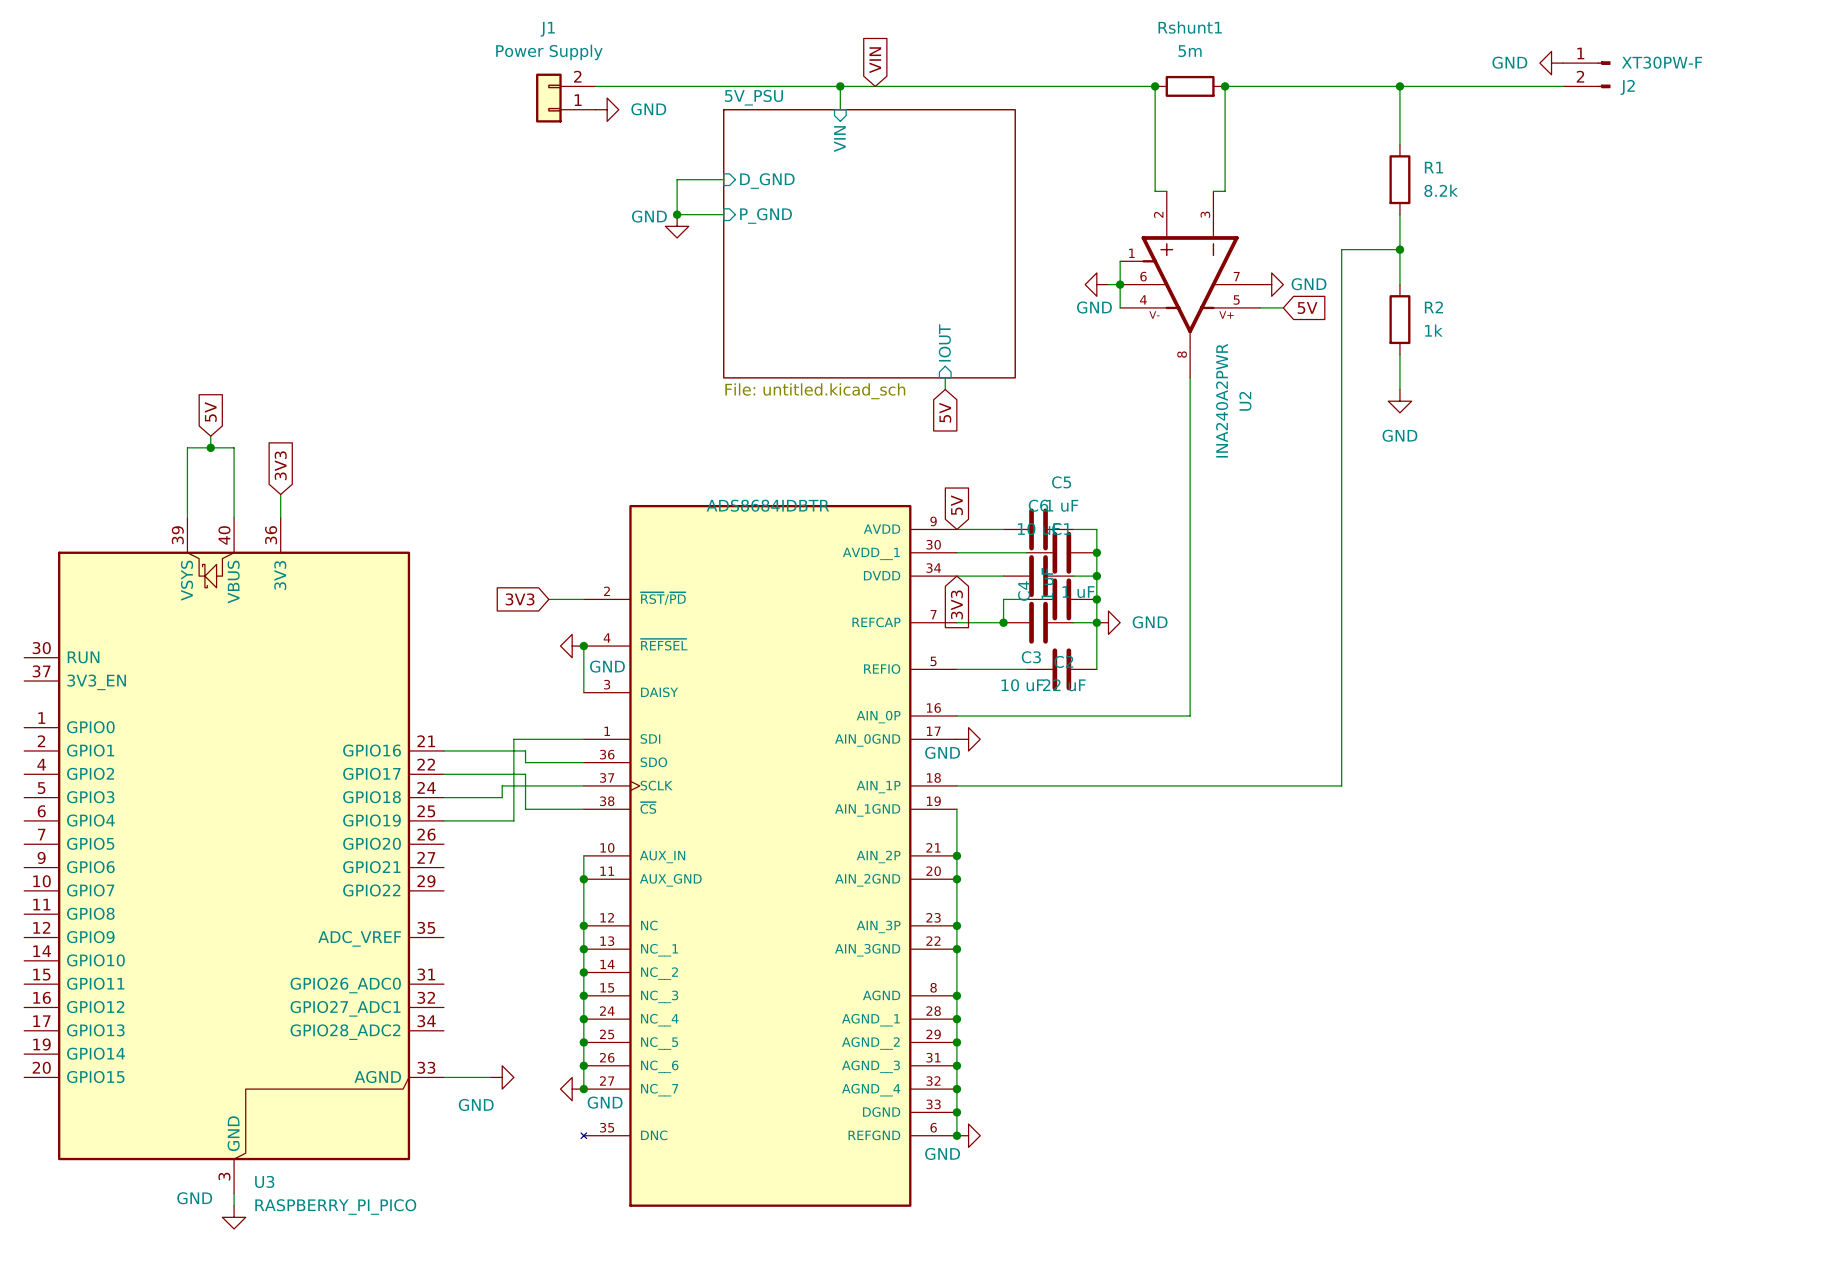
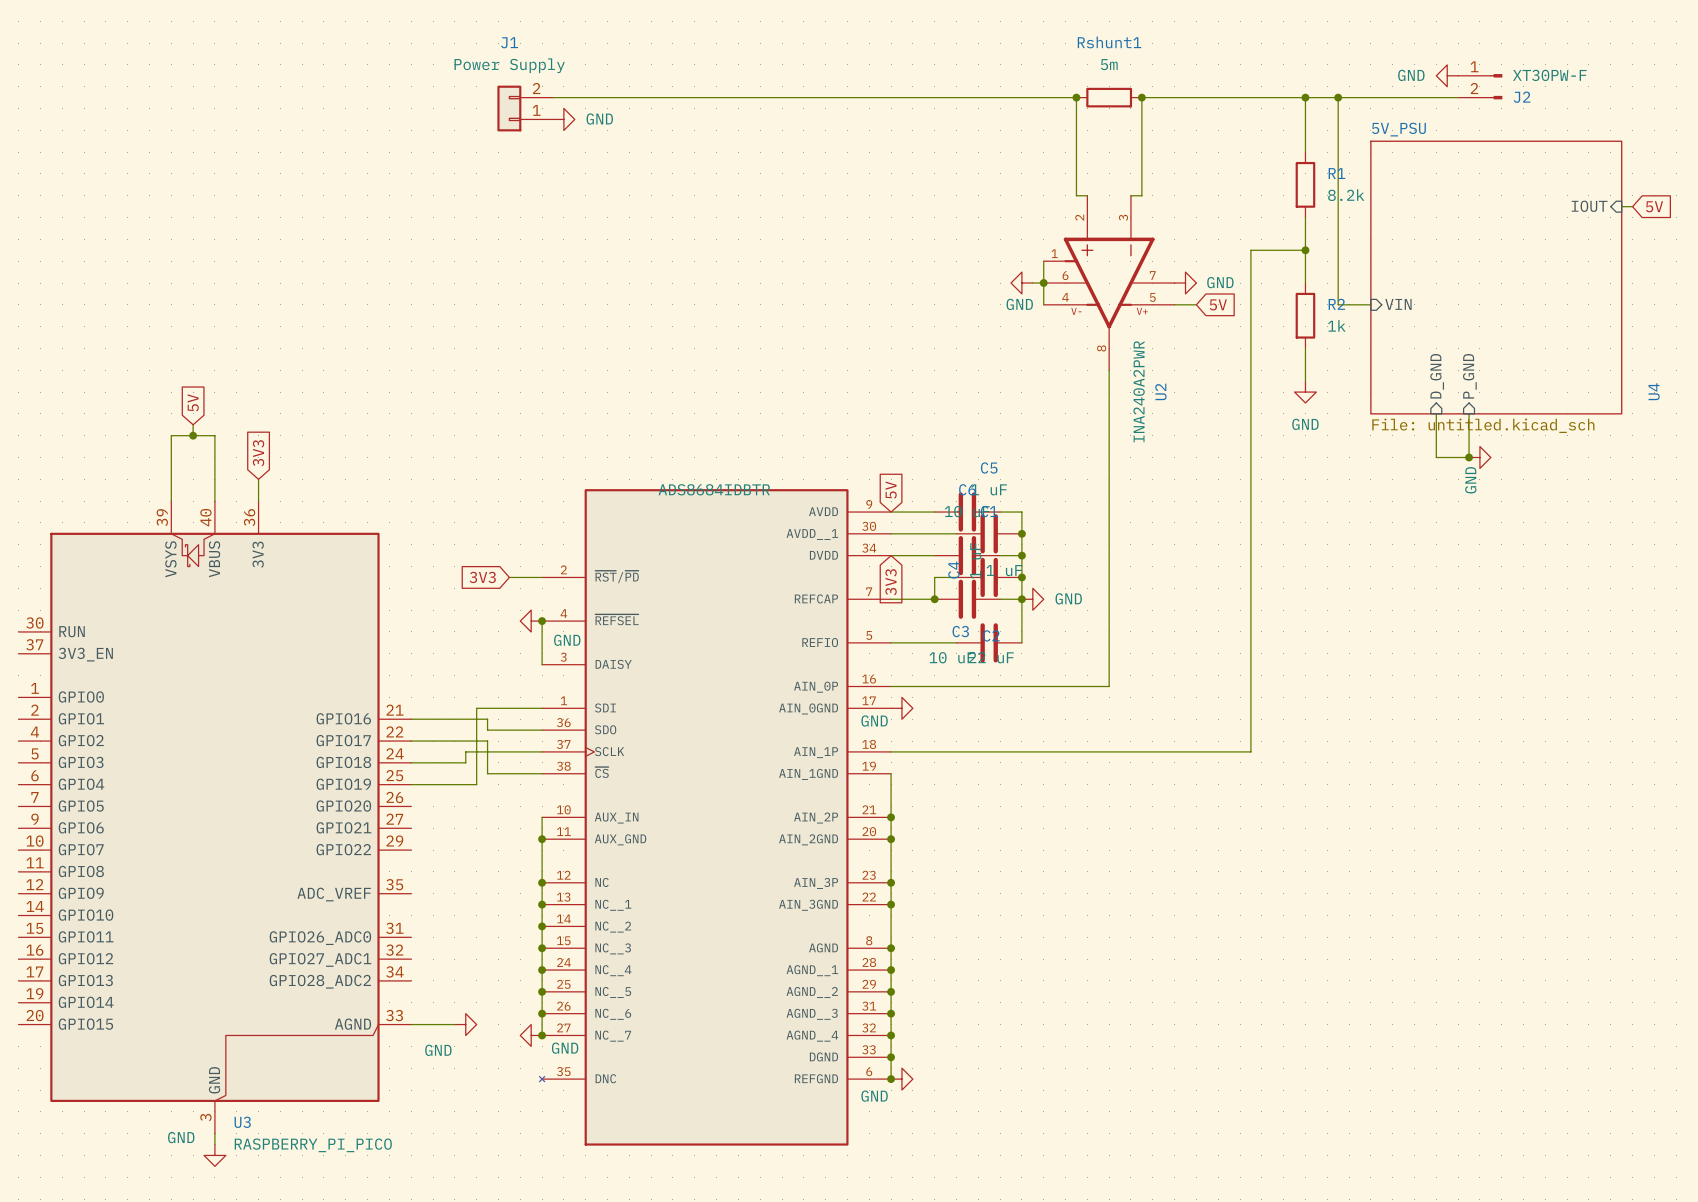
global label: VIN (875, 60) -> none
wire: (840, 86) (840, 109) -> none
junction: (840, 86) -> none
wire: none -> (1338, 97) (1338, 304) (1370, 304)
junction: none -> (1338, 97)
sheet pin: VIN (839, 139) -> none
wire: (723, 179) (677, 179) (677, 214) (723, 214) -> none
sheet pin: D_GND (767, 181) -> none
sheet pin: none -> IOUT (1589, 206)
wire: none -> (1621, 206) (1632, 206)
global label: none -> 5V (1654, 206)
junction: (677, 214) -> none
sheet pin: P_GND (766, 216) -> none
power symbol: GND (677, 226) -> none
sheet 5V_PSU rotation: 0° (869, 243) -> 90° clockwise (1496, 277)
sheet 5V_PSU position: (869, 243) -> (1496, 277)
sheet pin: none -> VIN (1398, 304)
sheet pin: IOUT (944, 342) -> none
wire: (945, 377) (945, 389) -> none
sheet pin: none -> D_GND (1437, 376)
sheet pin: none -> P_GND (1469, 376)
U4 name: none -> U4 (1654, 391)
global label: 5V (945, 412) -> none
wire: none -> (1436, 413) (1436, 457) (1469, 457) (1469, 413)
junction: none -> (1469, 457)
power symbol: none -> GND (1479, 457)

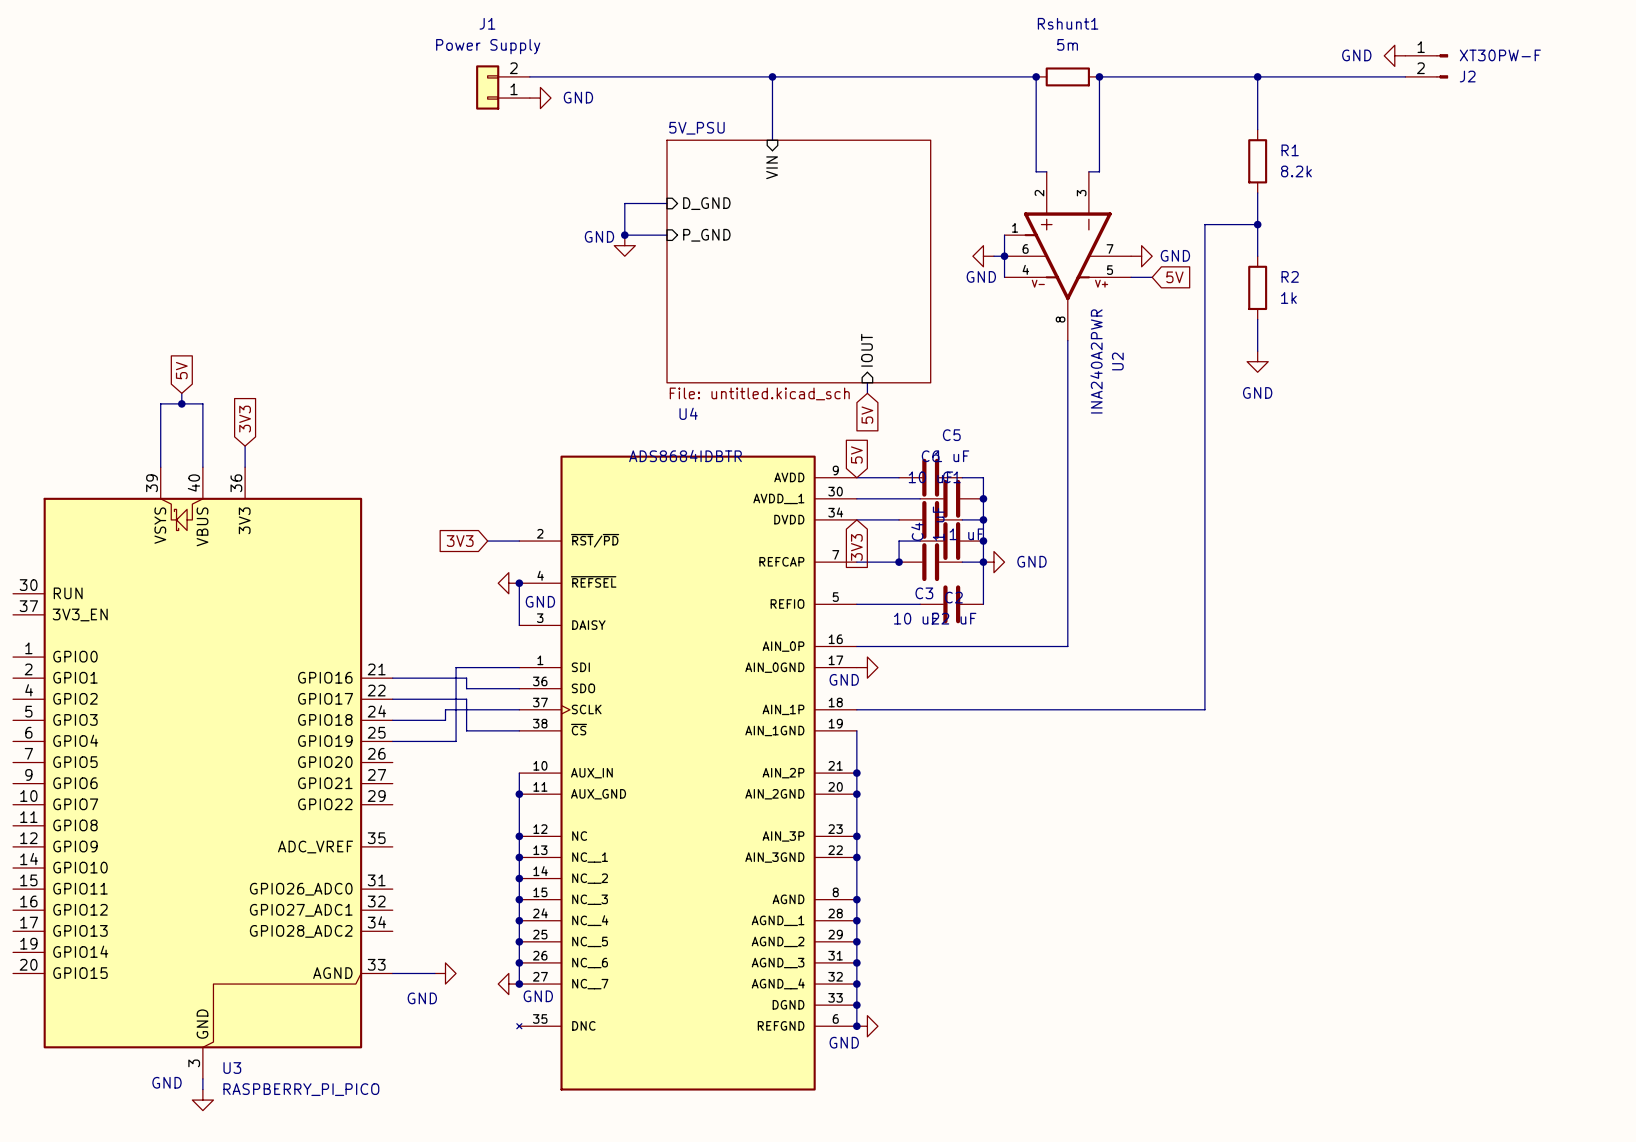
wire: none -> (772, 76) (772, 140)
junction: none -> (772, 76)
wire: (1338, 97) (1338, 304) (1370, 304) -> none
junction: (1338, 97) -> none
sheet pin: none -> VIN (772, 167)
sheet pin: IOUT (1589, 206) -> none
wire: (1621, 206) (1632, 206) -> none
global label: 5V (1654, 206) -> none
wire: none -> (667, 203) (624, 203) (624, 235) (667, 235)
sheet pin: none -> D_GND (706, 203)
junction: none -> (624, 235)
sheet pin: none -> P_GND (706, 235)
power symbol: none -> GND (624, 245)
sheet 5V_PSU rotation: 0° (1496, 277) -> 90° clockwise (798, 261)
sheet 5V_PSU position: (1496, 277) -> (798, 261)
sheet pin: VIN (1398, 304) -> none
sheet pin: D_GND (1437, 376) -> none
sheet pin: P_GND (1469, 376) -> none
sheet pin: none -> IOUT (867, 350)
U4 name rotation: 0° (1654, 391) -> 90° clockwise (688, 413)
U4 name position: U4 (1654, 391) -> U4 (688, 413)
wire: none -> (867, 382) (867, 393)
wire: (1436, 413) (1436, 457) (1469, 457) (1469, 413) -> none
global label: none -> 5V (867, 415)
junction: (1469, 457) -> none
power symbol: GND (1479, 457) -> none

